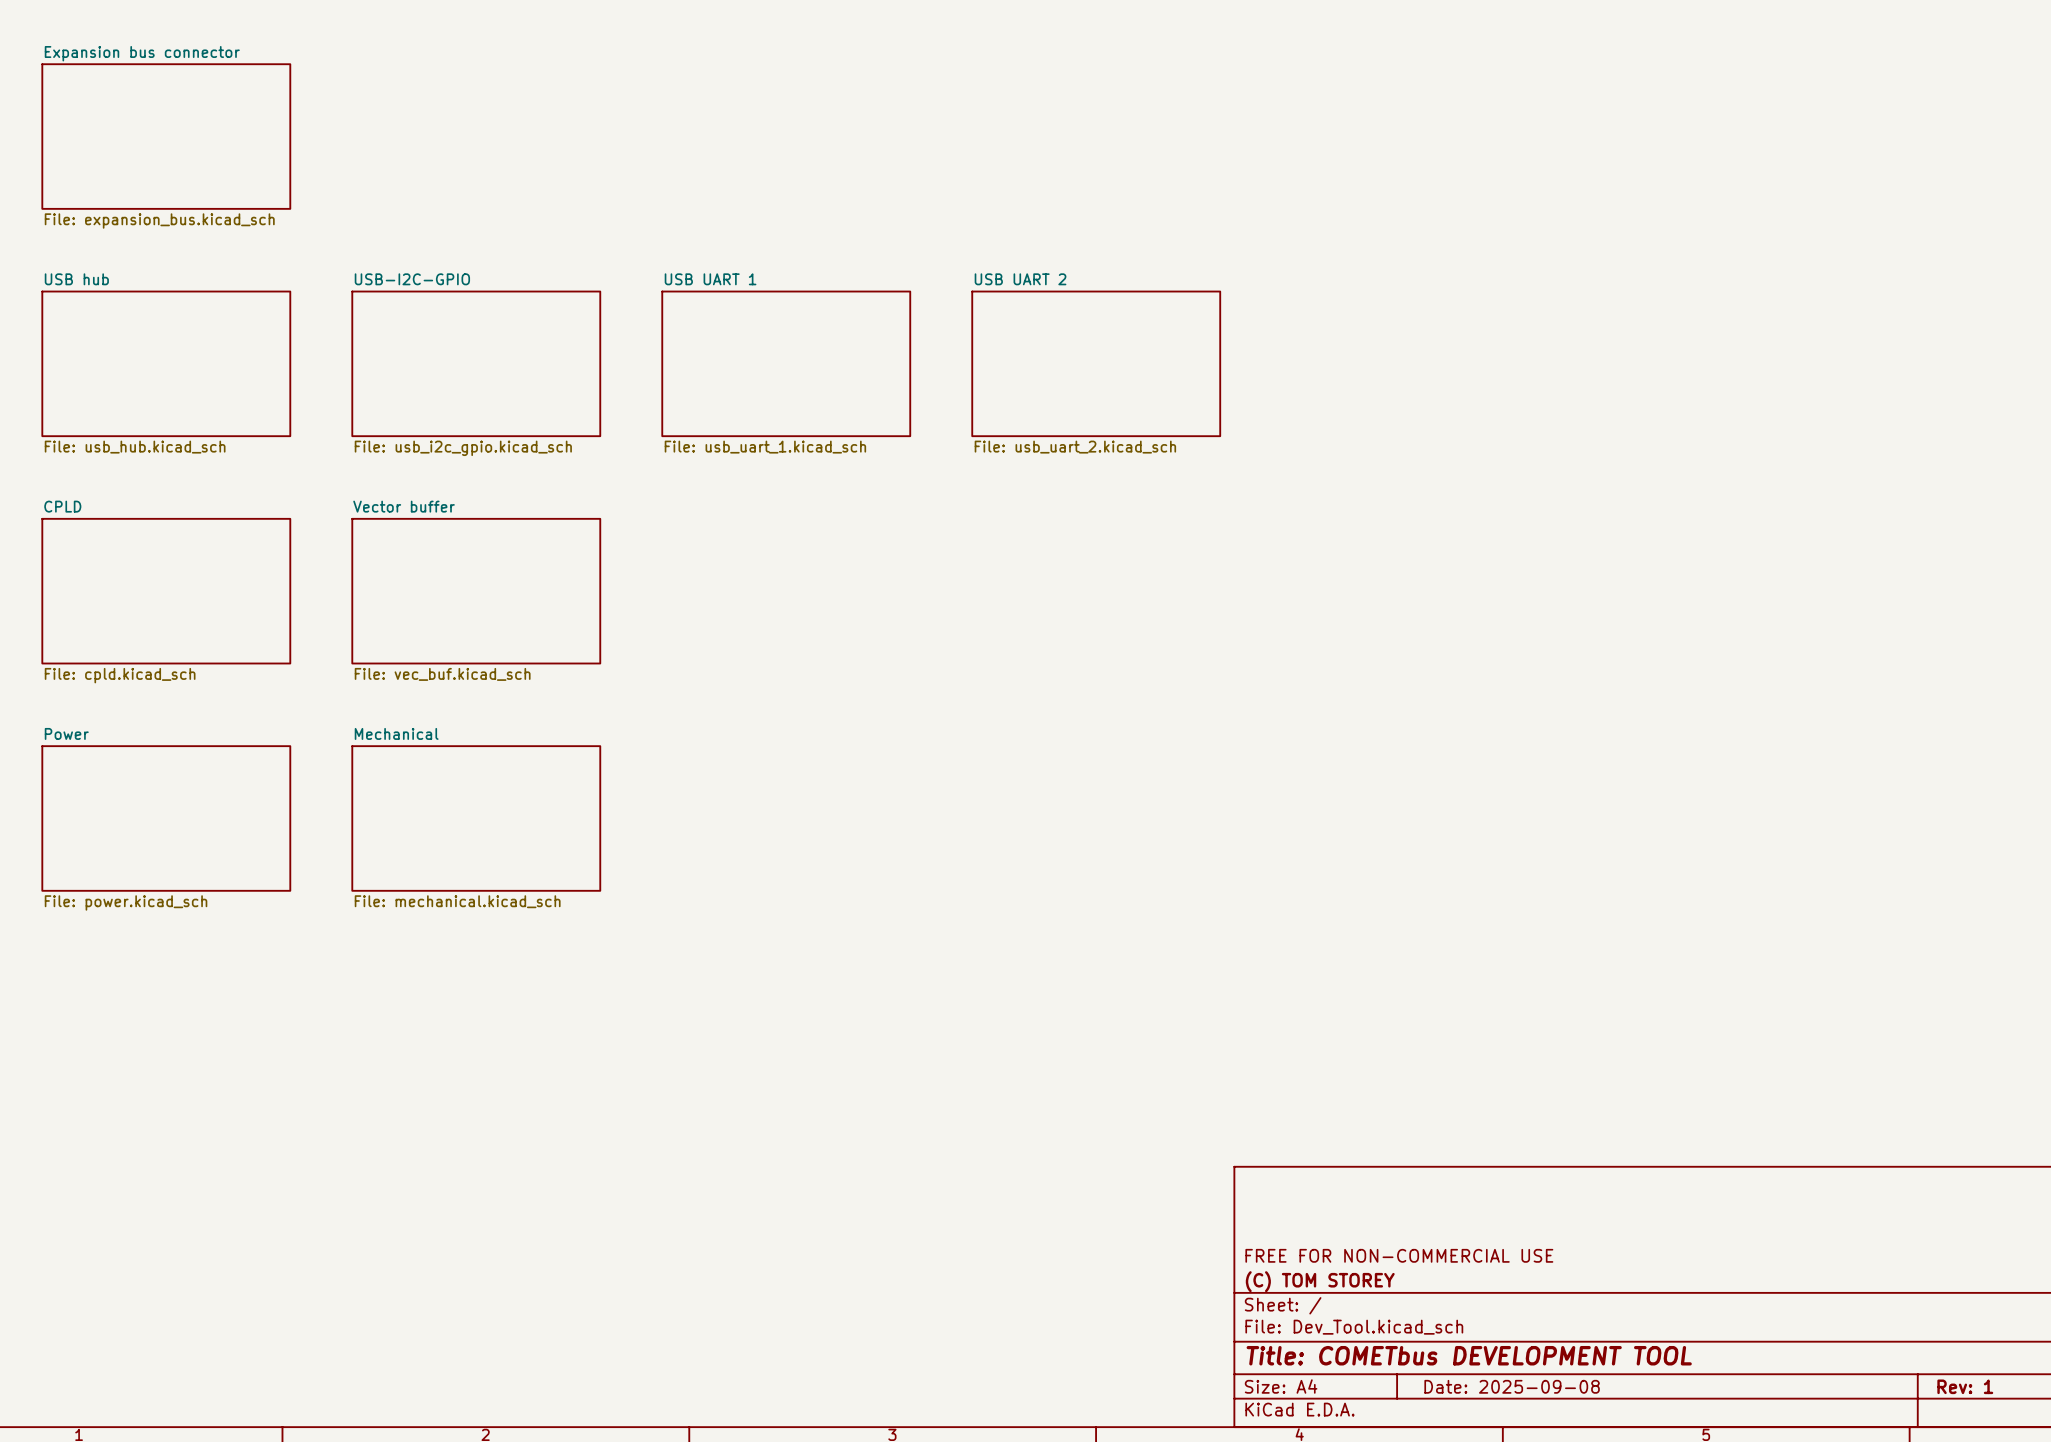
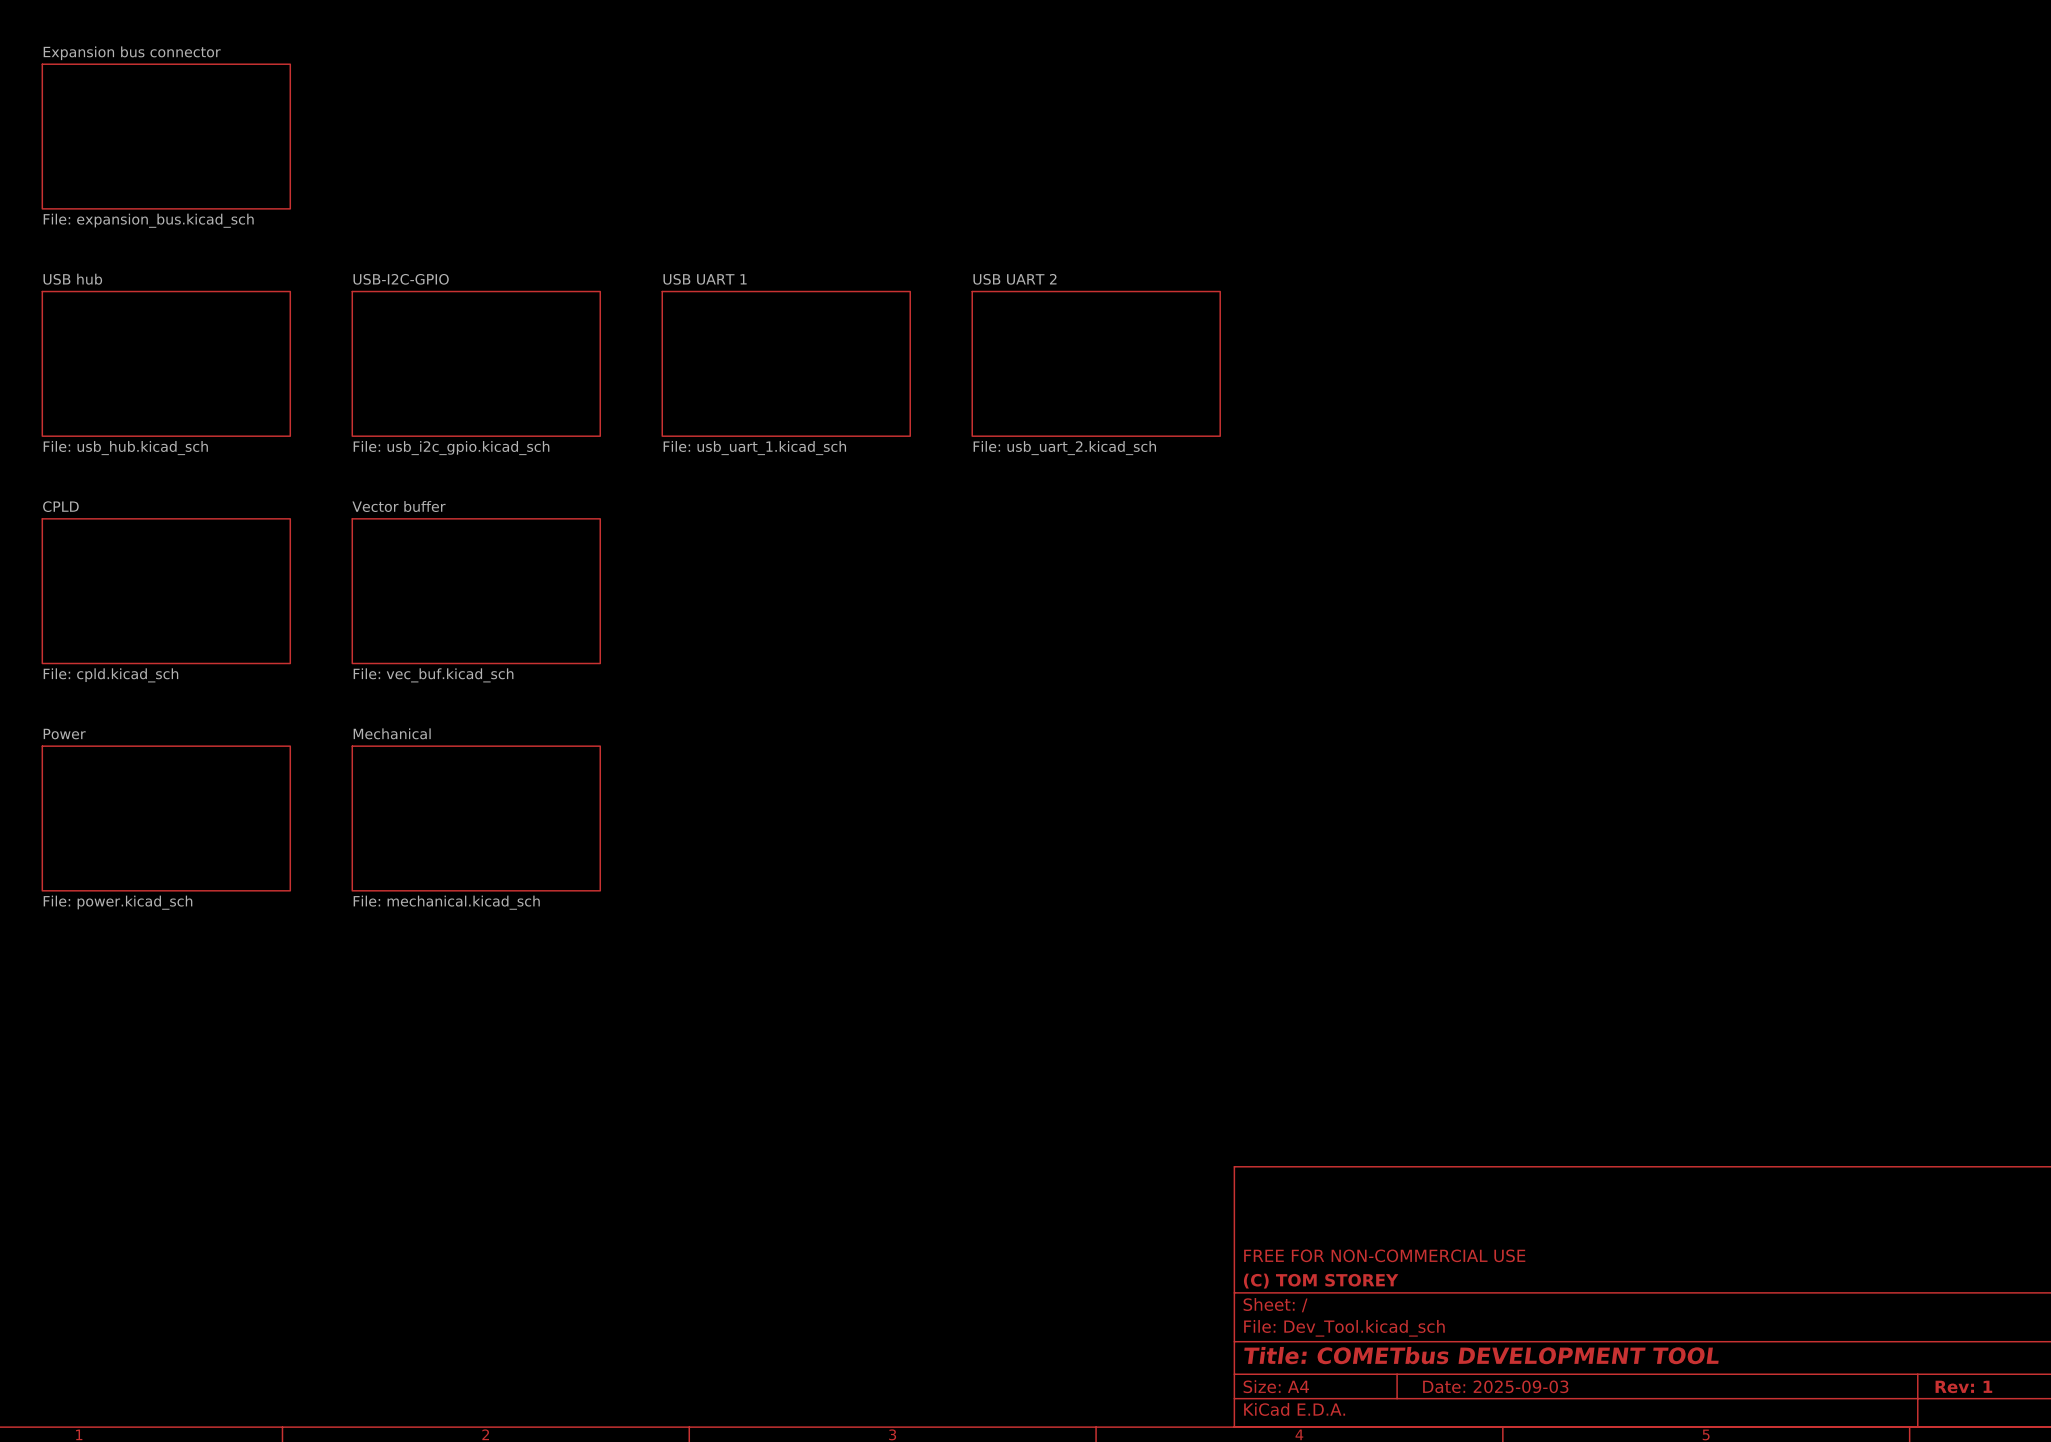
title block: Date: 2025-09-08 (1512, 1386) -> Date: 2025-09-03 (1495, 1386)

